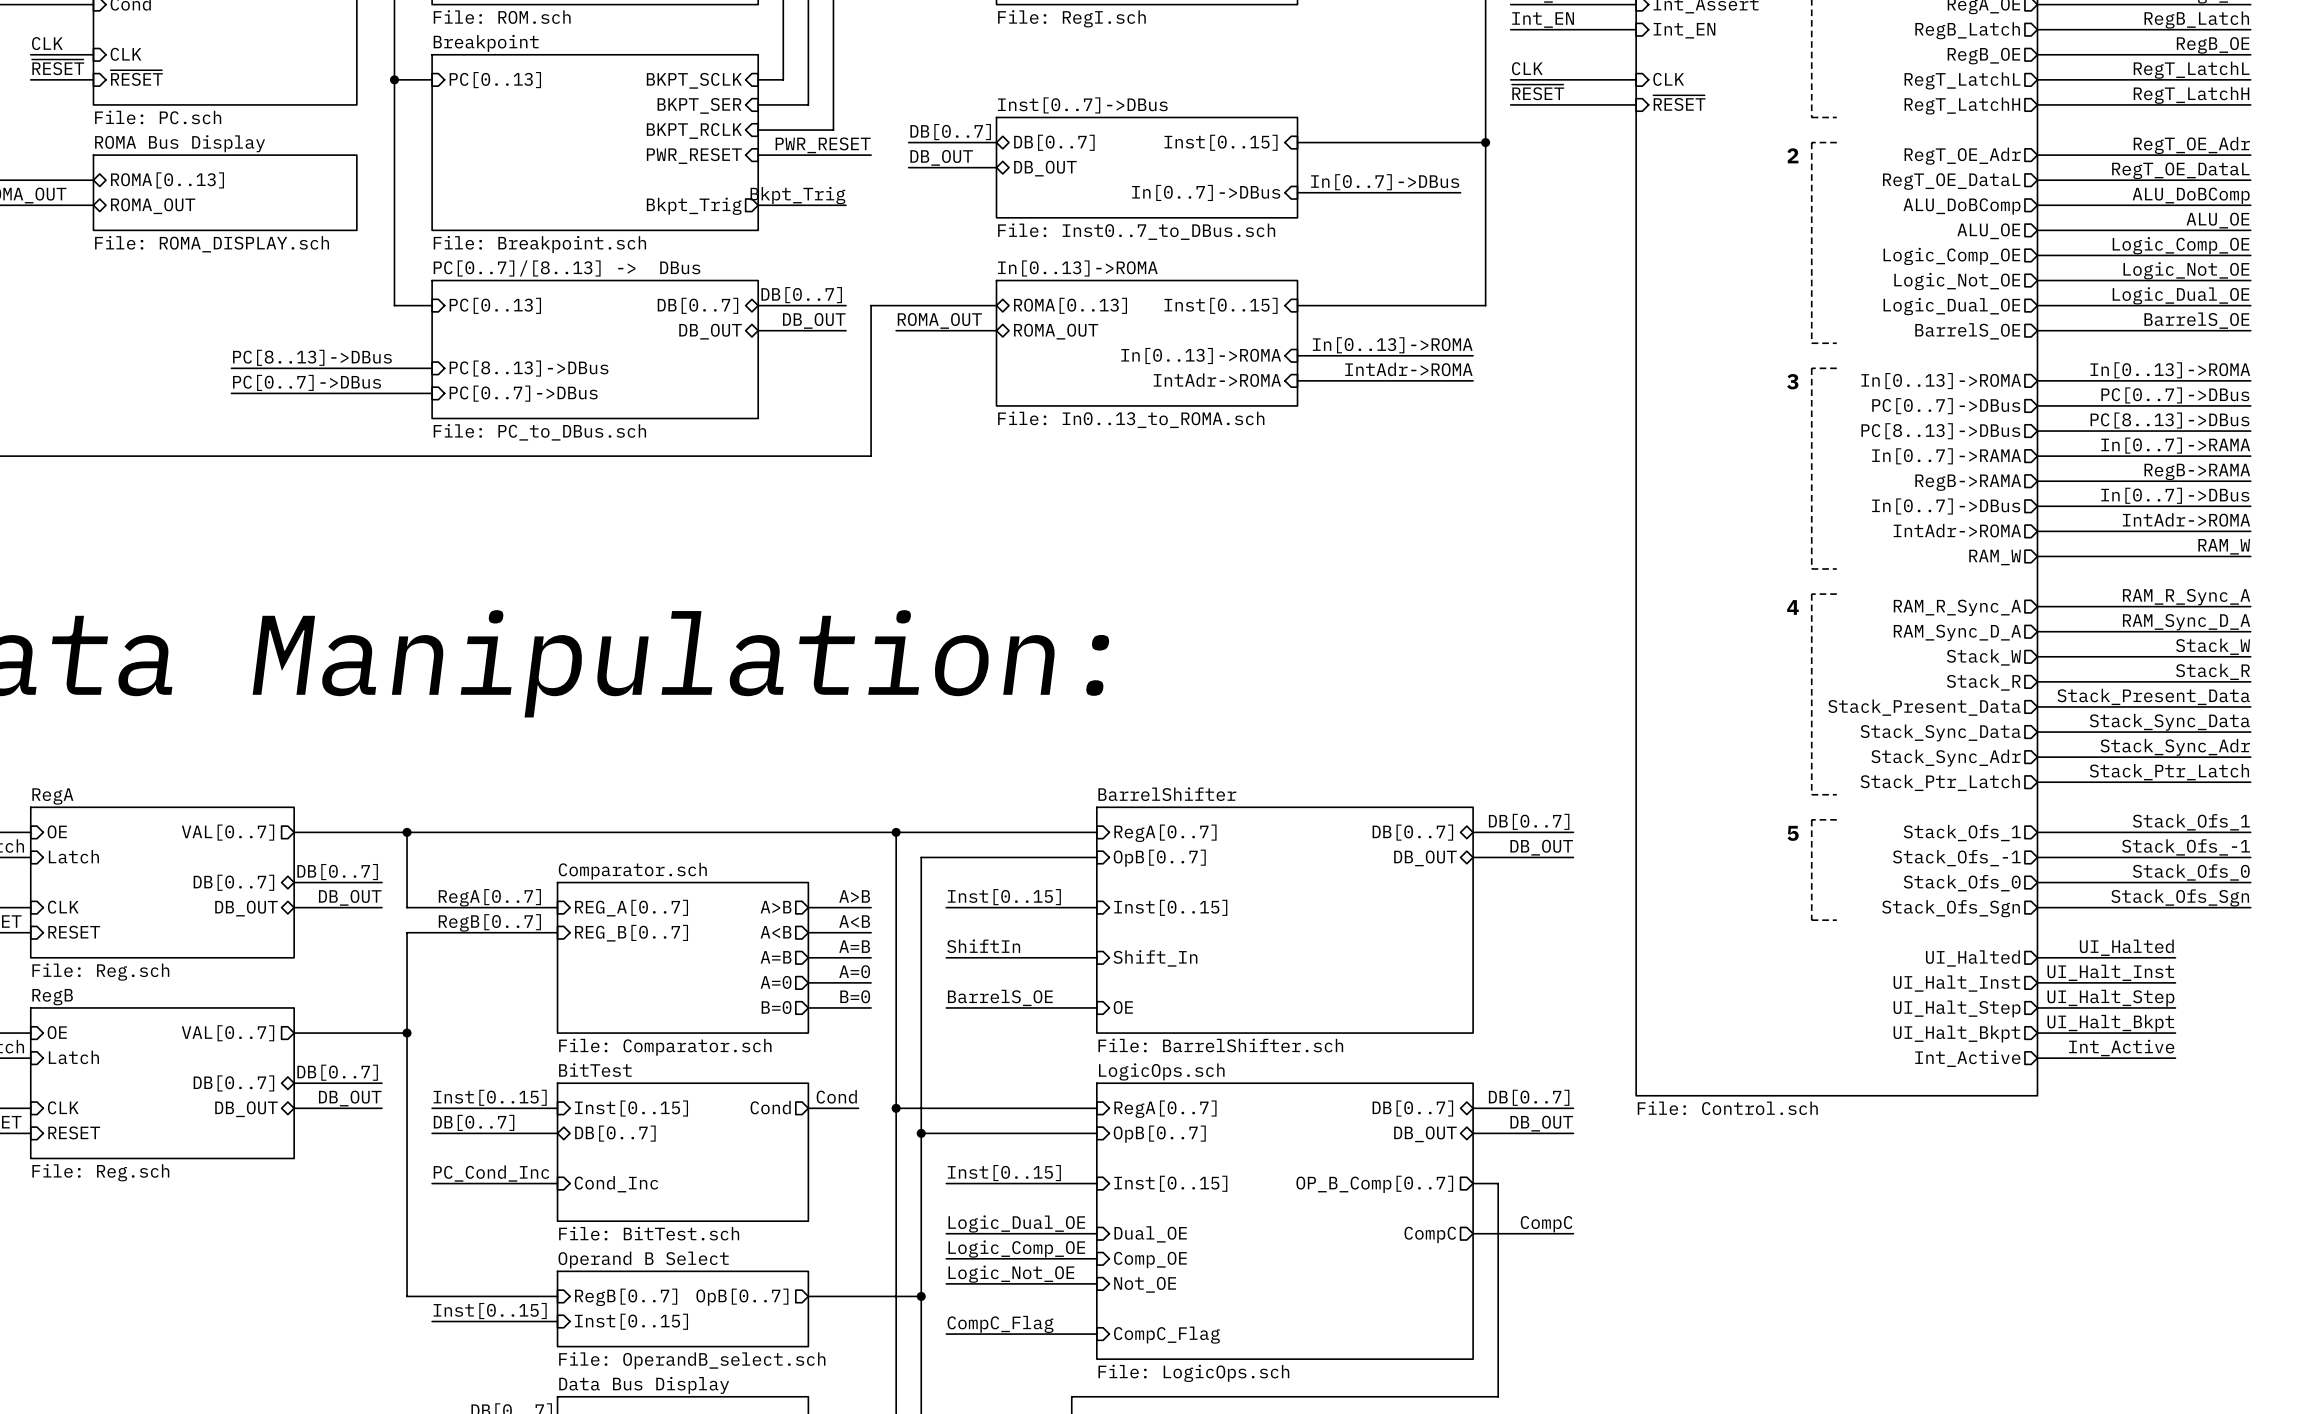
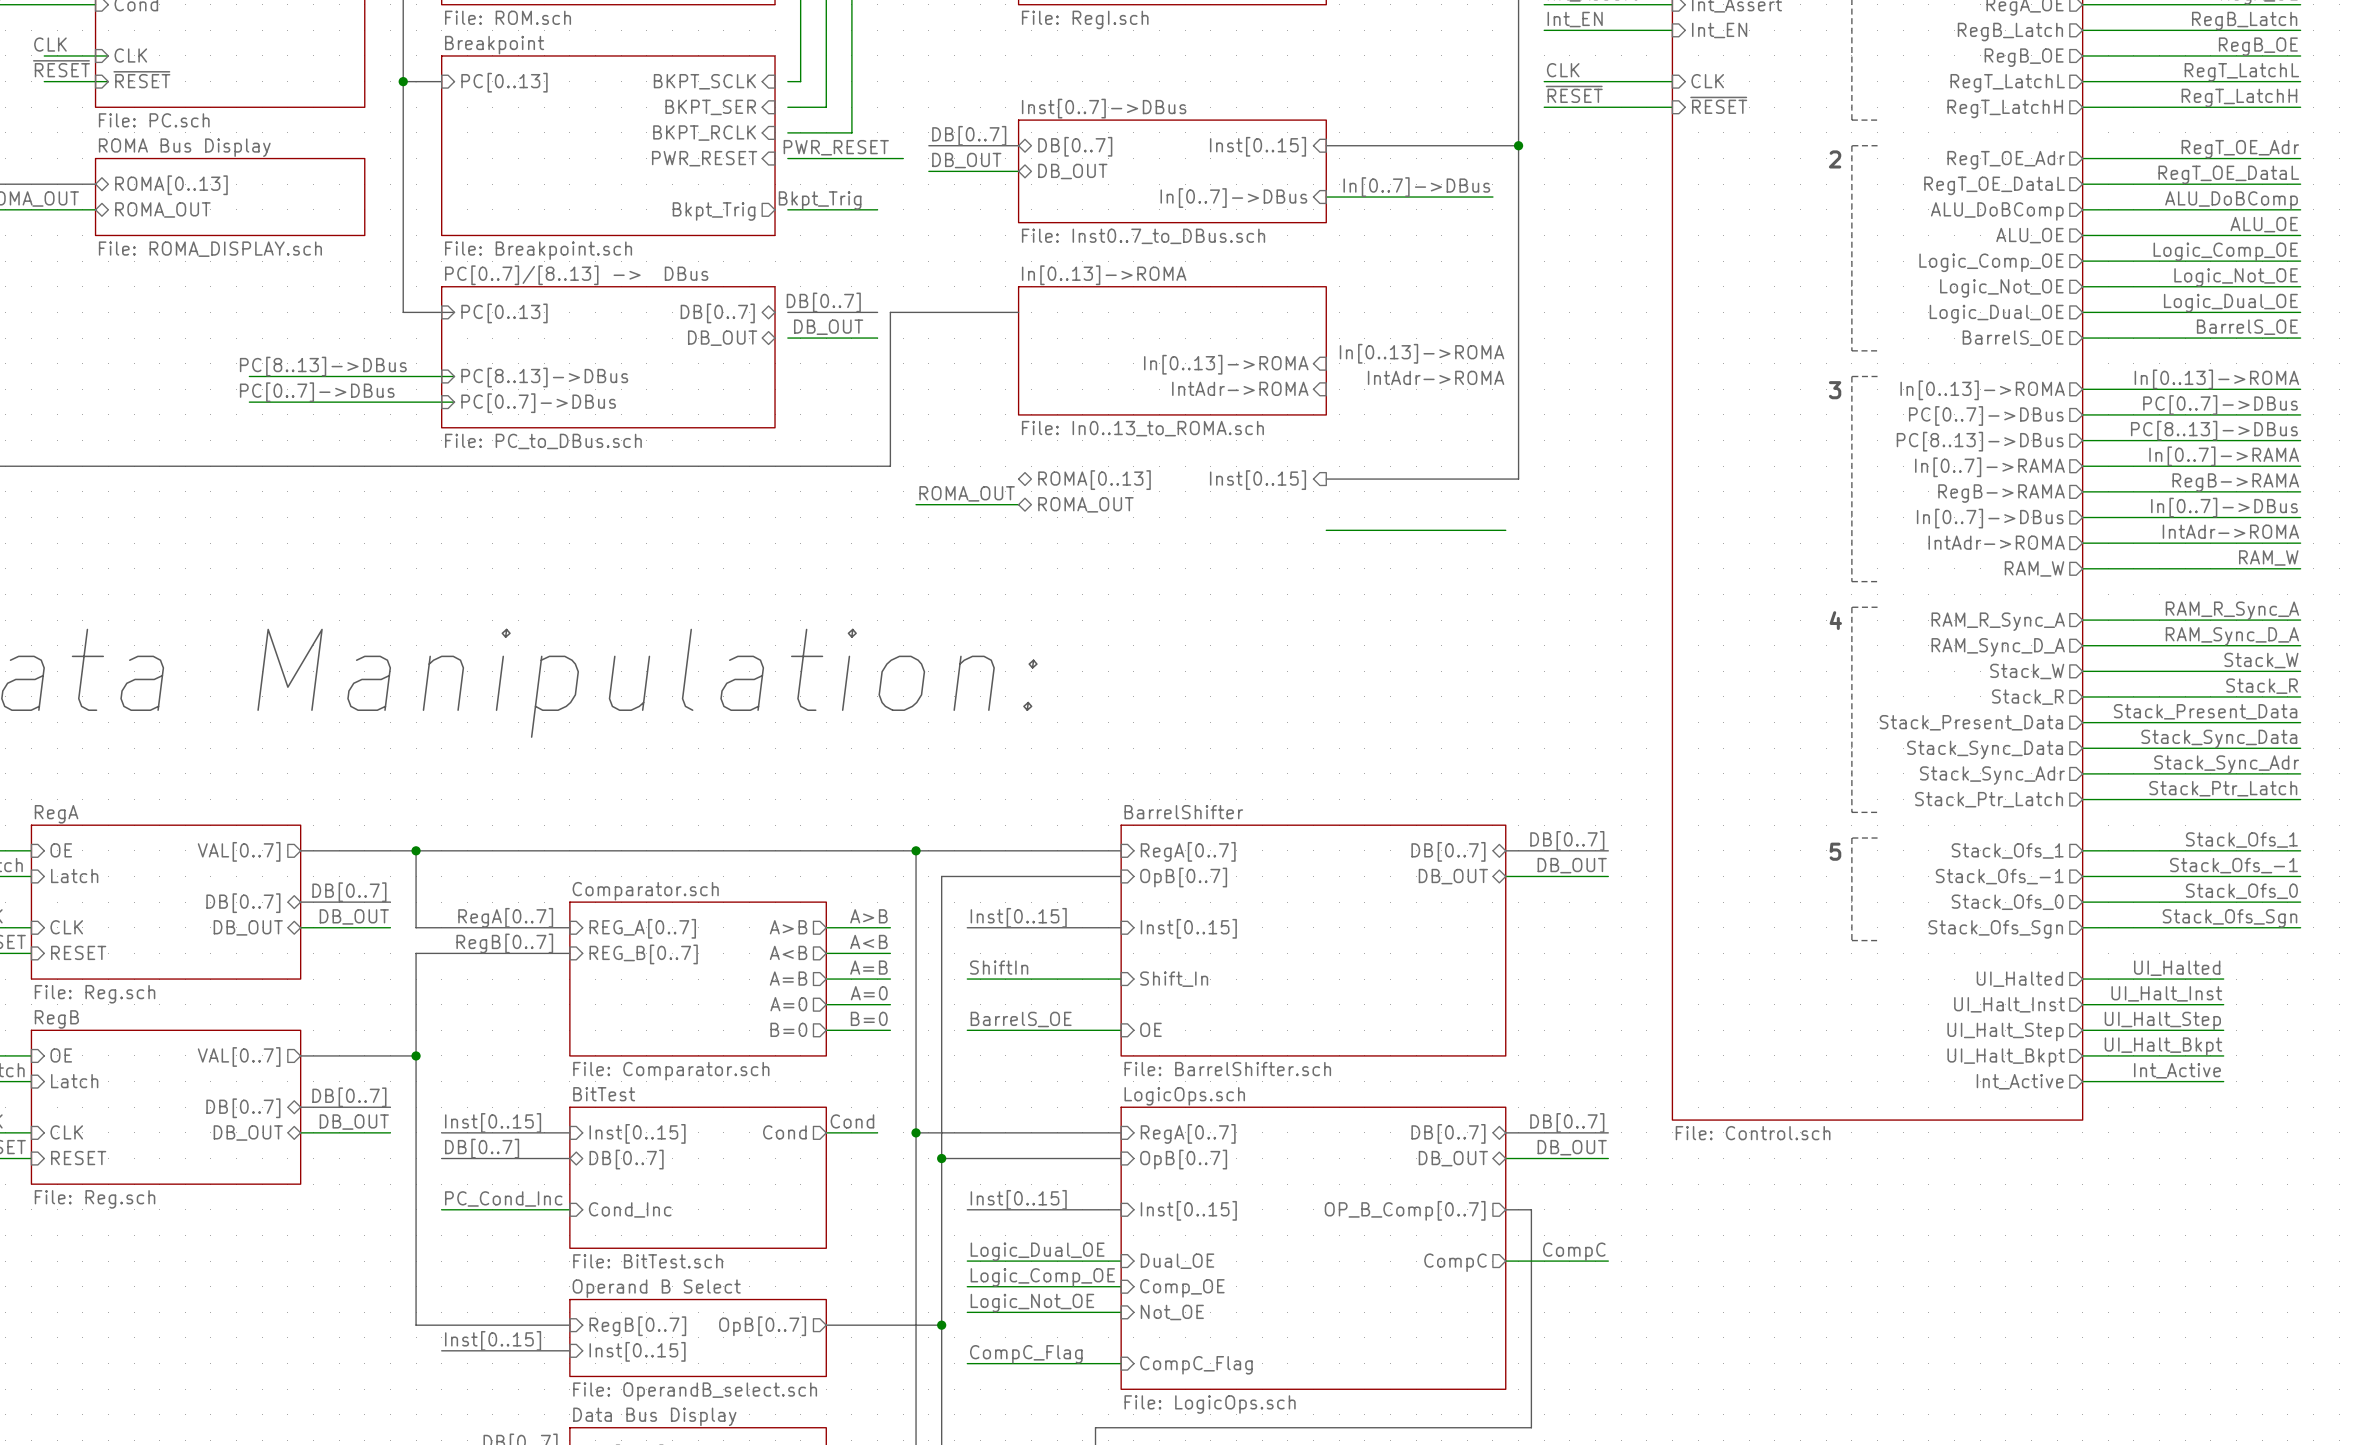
wire: (30, 54) (43, 54) -> (95, 55) (108, 55)
wire: (30, 79) (43, 79) -> (95, 81) (108, 81)
wire: (758, 79) (770, 79) -> none
wire: (758, 104) (770, 104) -> none
wire: (758, 130) (770, 130) -> none
wire: (758, 155) (770, 155) -> (890, 158) (903, 158)
wire: (758, 205) (770, 205) -> (864, 209) (877, 209)
bus: none -> (441, 312) (454, 312)
bus: (758, 305) (770, 305) -> (864, 312) (877, 312)
sheet pin position: ROMA[0..13] (1070, 305) -> ROMA[0..13] (1094, 480)
sheet pin position: Inst[0..15] (1221, 305) -> Inst[0..15] (1258, 480)
bus: (1297, 305) (1485, 305) -> (1326, 479) (1518, 479) (1518, 312)
label position: ROMA_OUT (939, 320) -> ROMA_OUT (967, 493)
wire: (758, 330) (770, 330) -> (864, 338) (877, 338)
wire: (896, 330) (996, 330) -> (916, 504) (1018, 504)
sheet pin position: ROMA_OUT (1056, 331) -> ROMA_OUT (1085, 504)
wire: (1297, 355) (1473, 355) -> (1326, 530) (1505, 530)
wire: (231, 368) (243, 368) -> (441, 376) (454, 376)
wire: (1297, 380) (1473, 380) -> none
wire: (231, 393) (243, 393) -> (441, 402) (454, 402)

